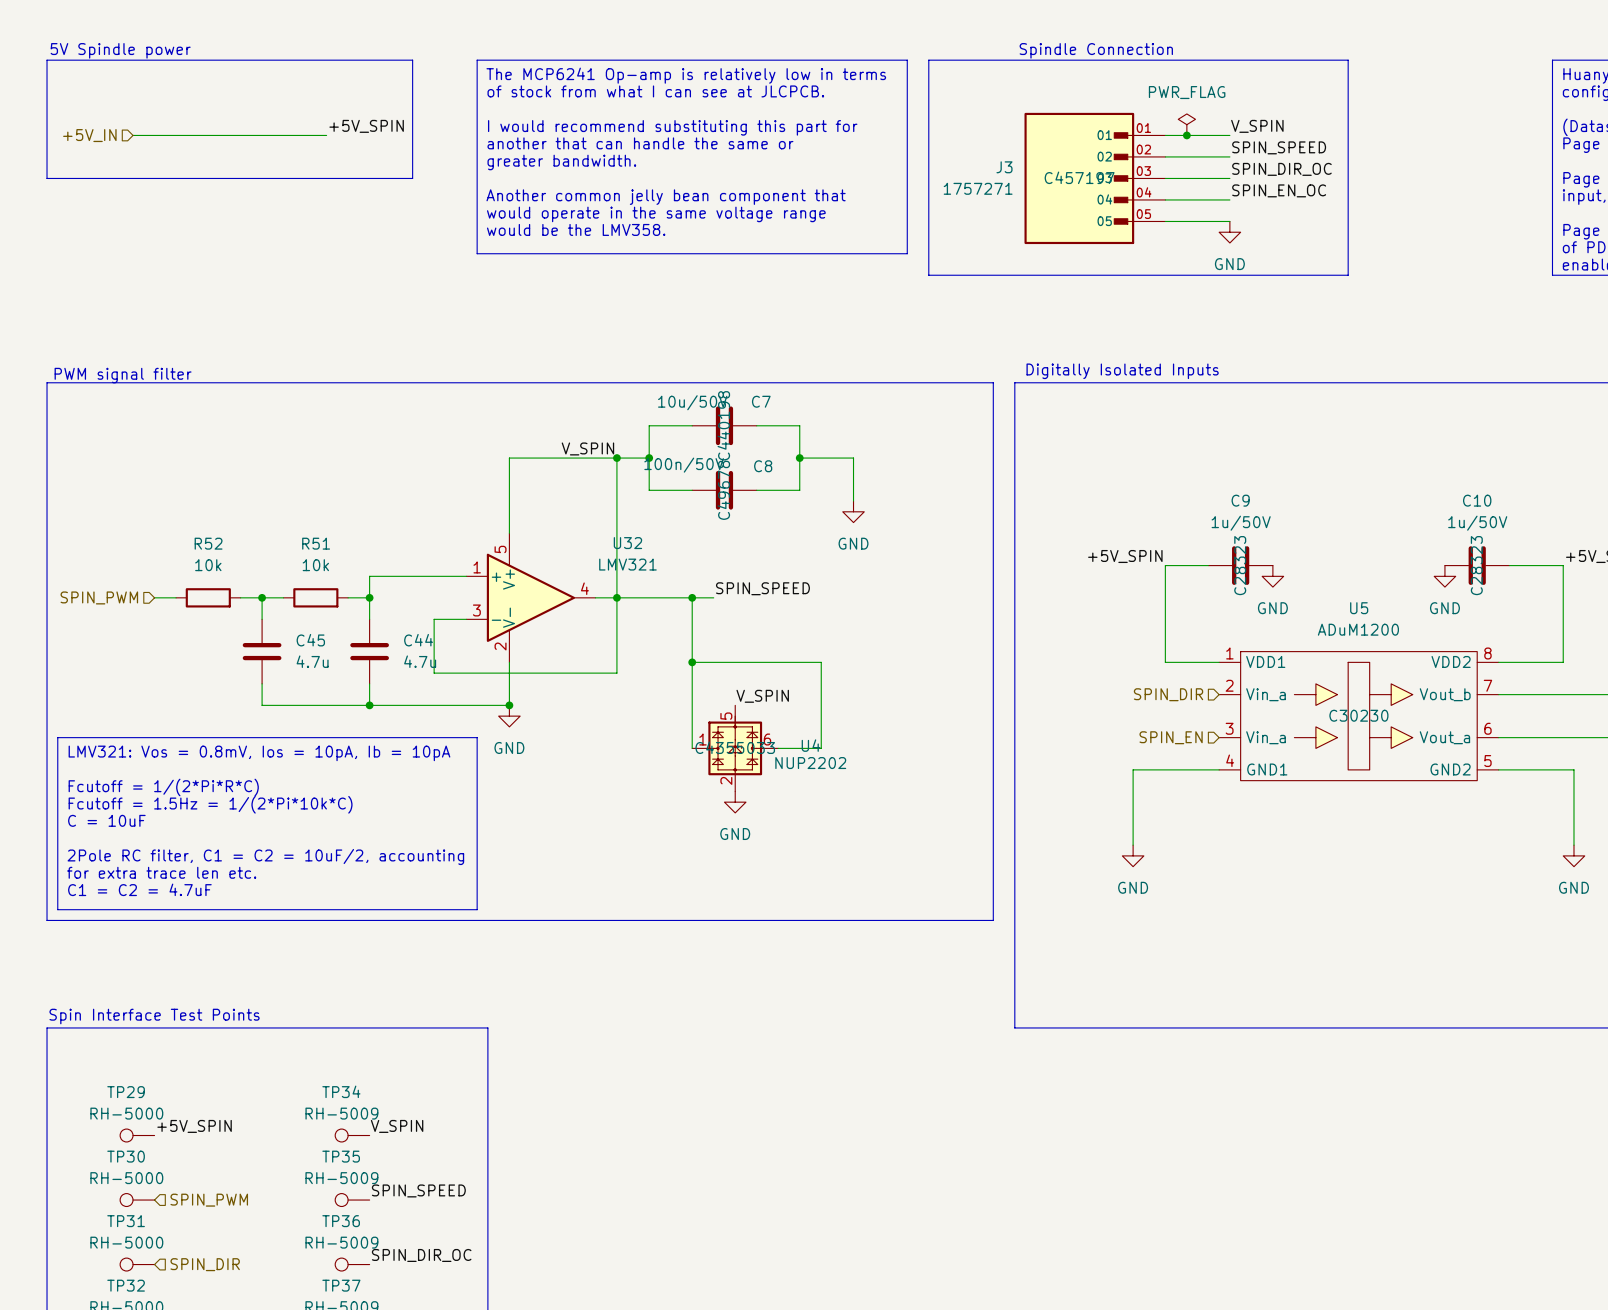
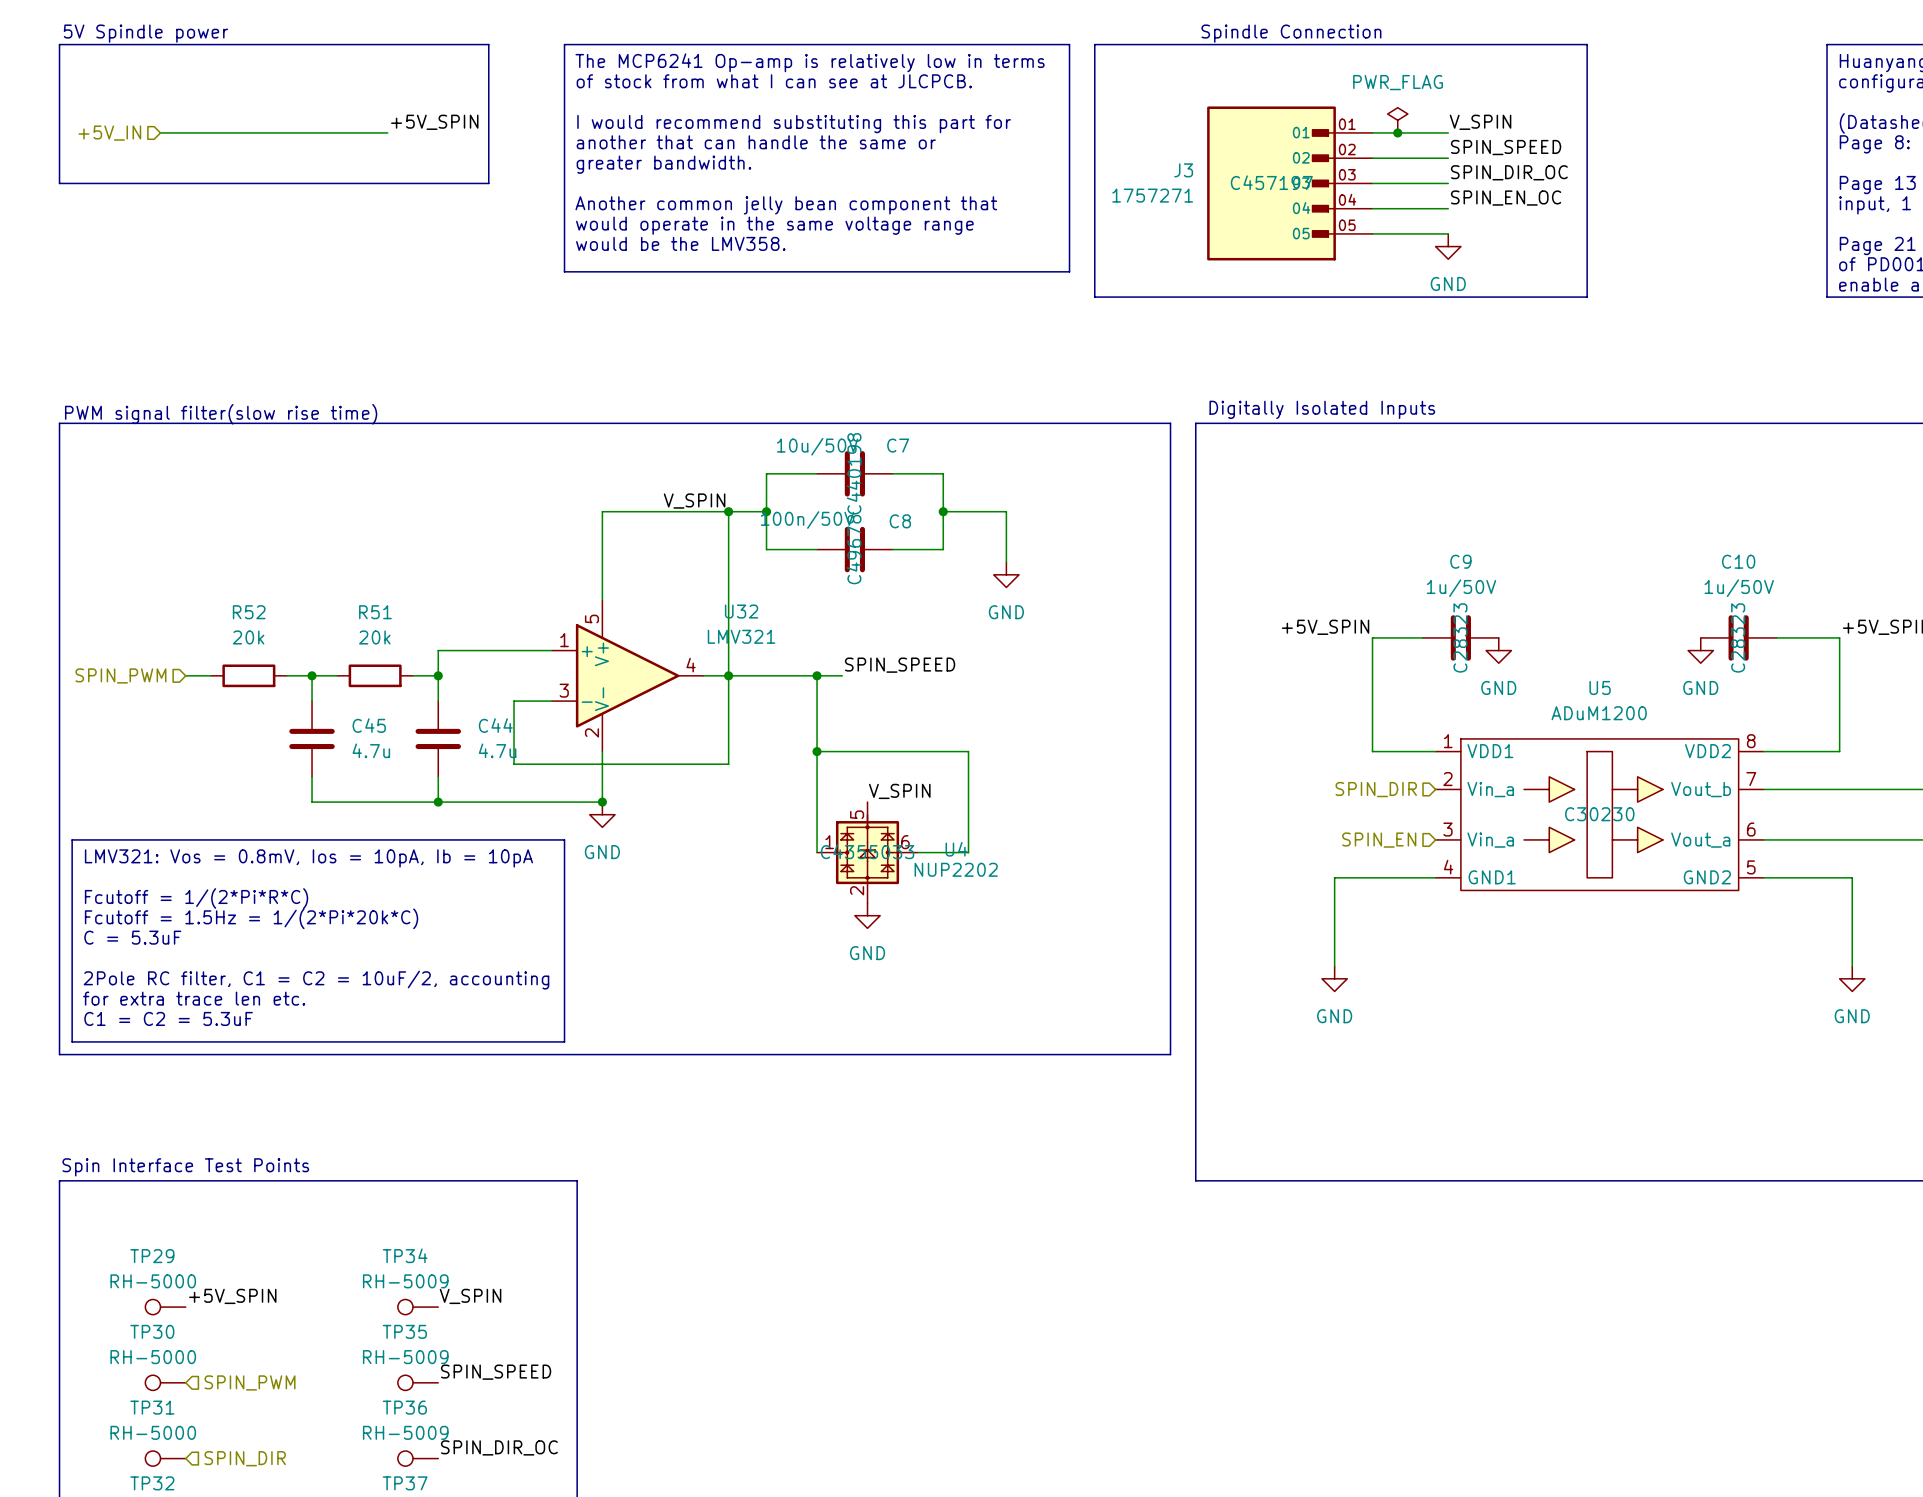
text: PWM signal filter (123, 375) -> PWM signal filter(slow rise time) (221, 414)
R52 value: 10k (208, 565) -> 20k (248, 637)
R51 value: 10k (315, 565) -> 20k (374, 637)
text: Fcutoff = 1.5Hz = 1/(2*Pi*10k*C) (210, 804) -> Fcutoff = 1.5Hz = 1/(2*Pi*20k*C) (251, 918)
text: C = 10uF (106, 820) -> C = 5.3uF (132, 937)
text: C1 = C2 = 4.7uF (139, 889) -> C1 = C2 = 5.3uF (168, 1018)

